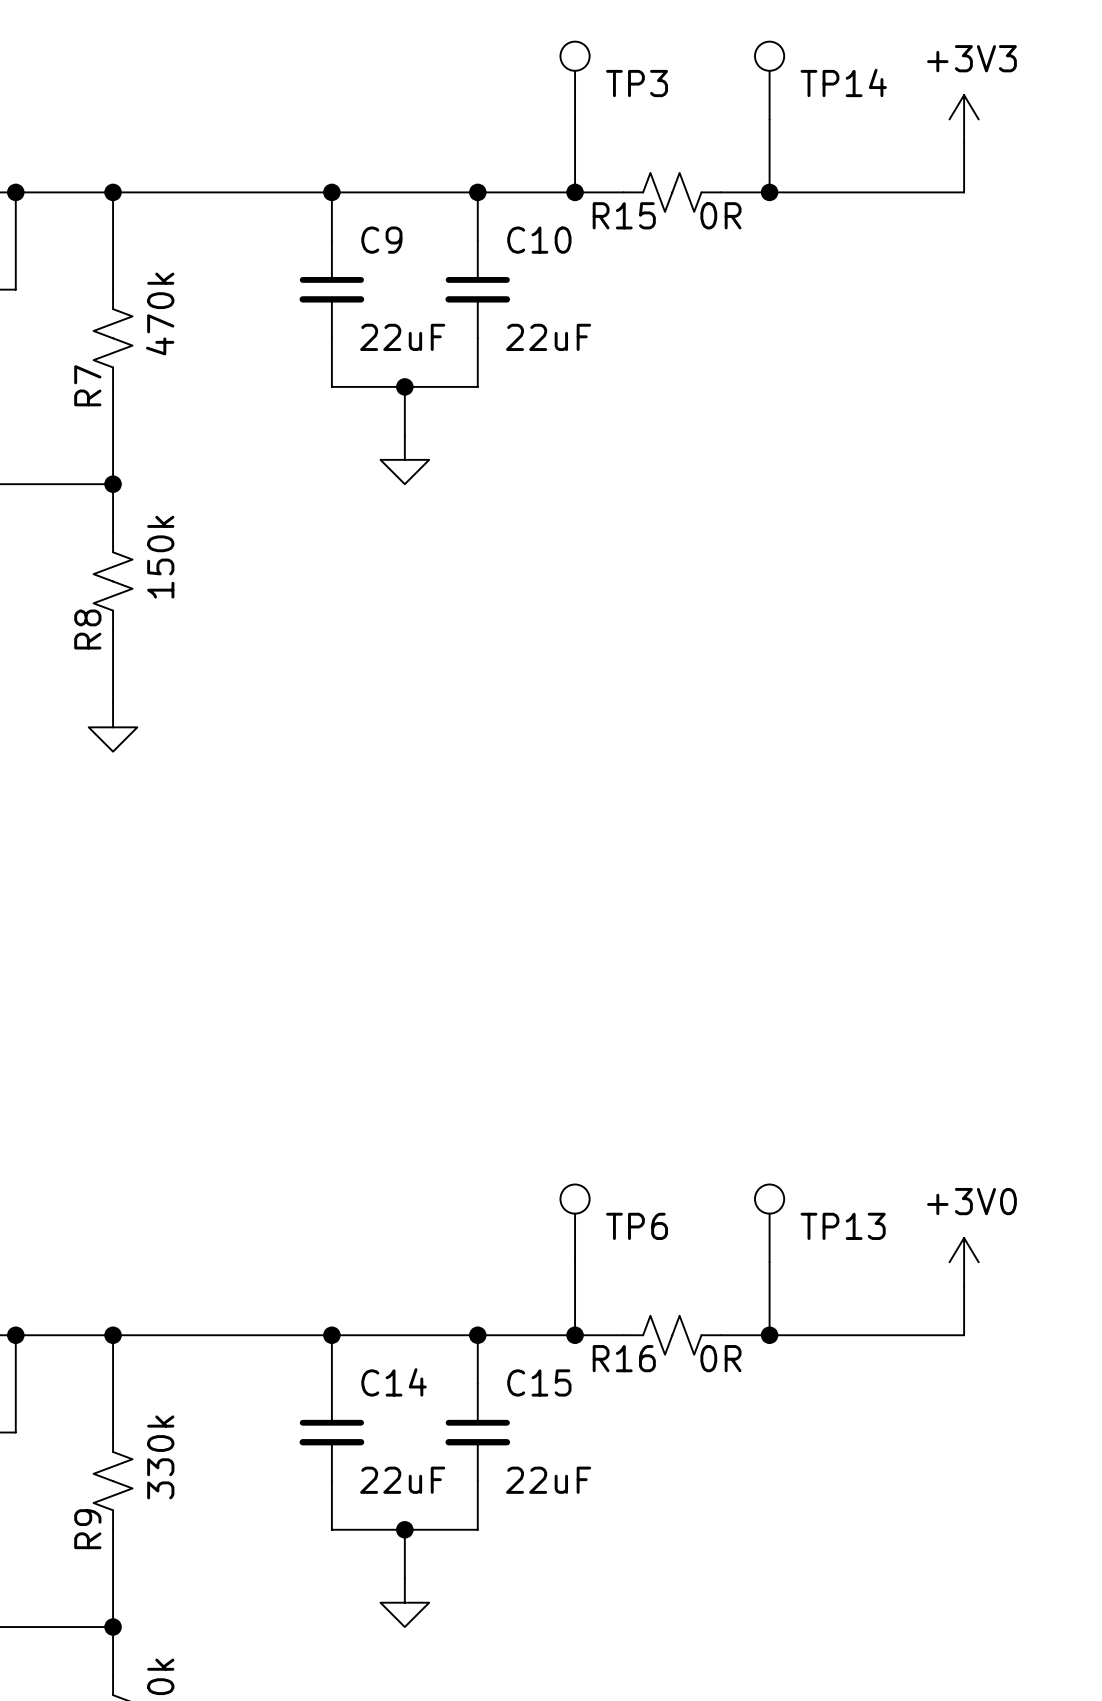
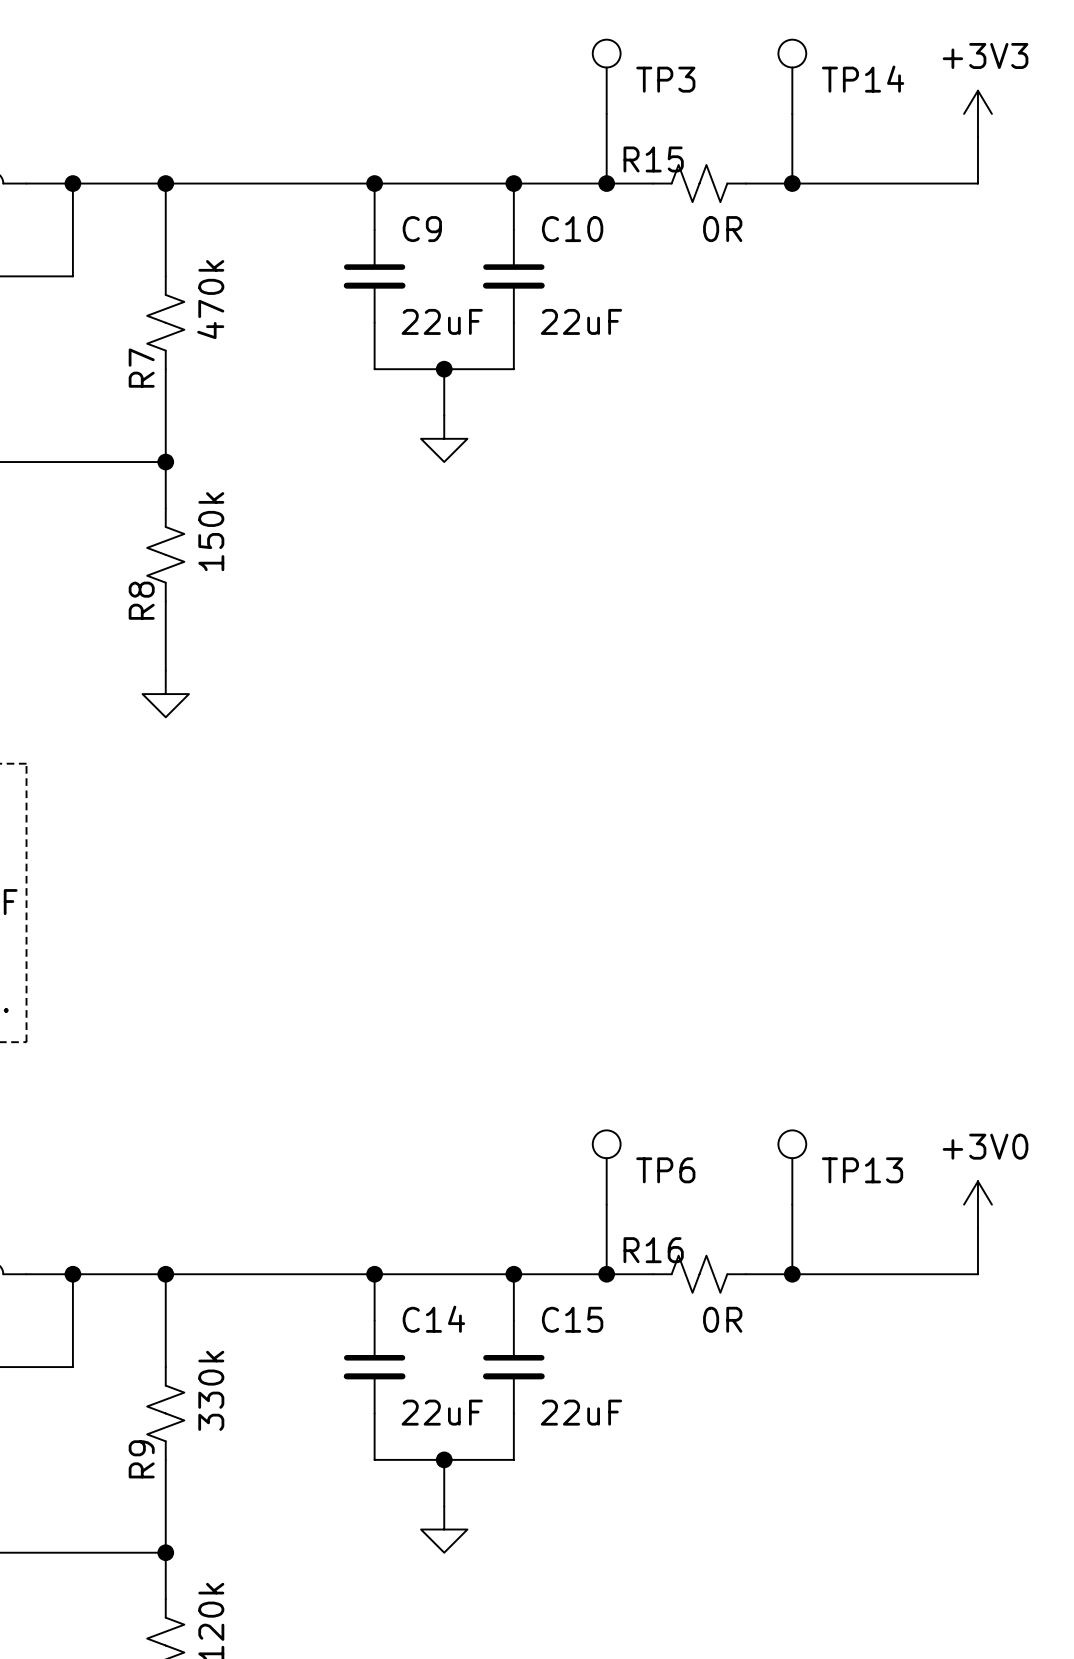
R15 name position: R15 (624, 215) -> R15 (653, 159)
R15 value position: 0R (720, 215) -> 0R (722, 229)
R16 name position: R16 (624, 1358) -> R16 (653, 1250)
R16 value position: 0R (720, 1358) -> 0R (722, 1319)

